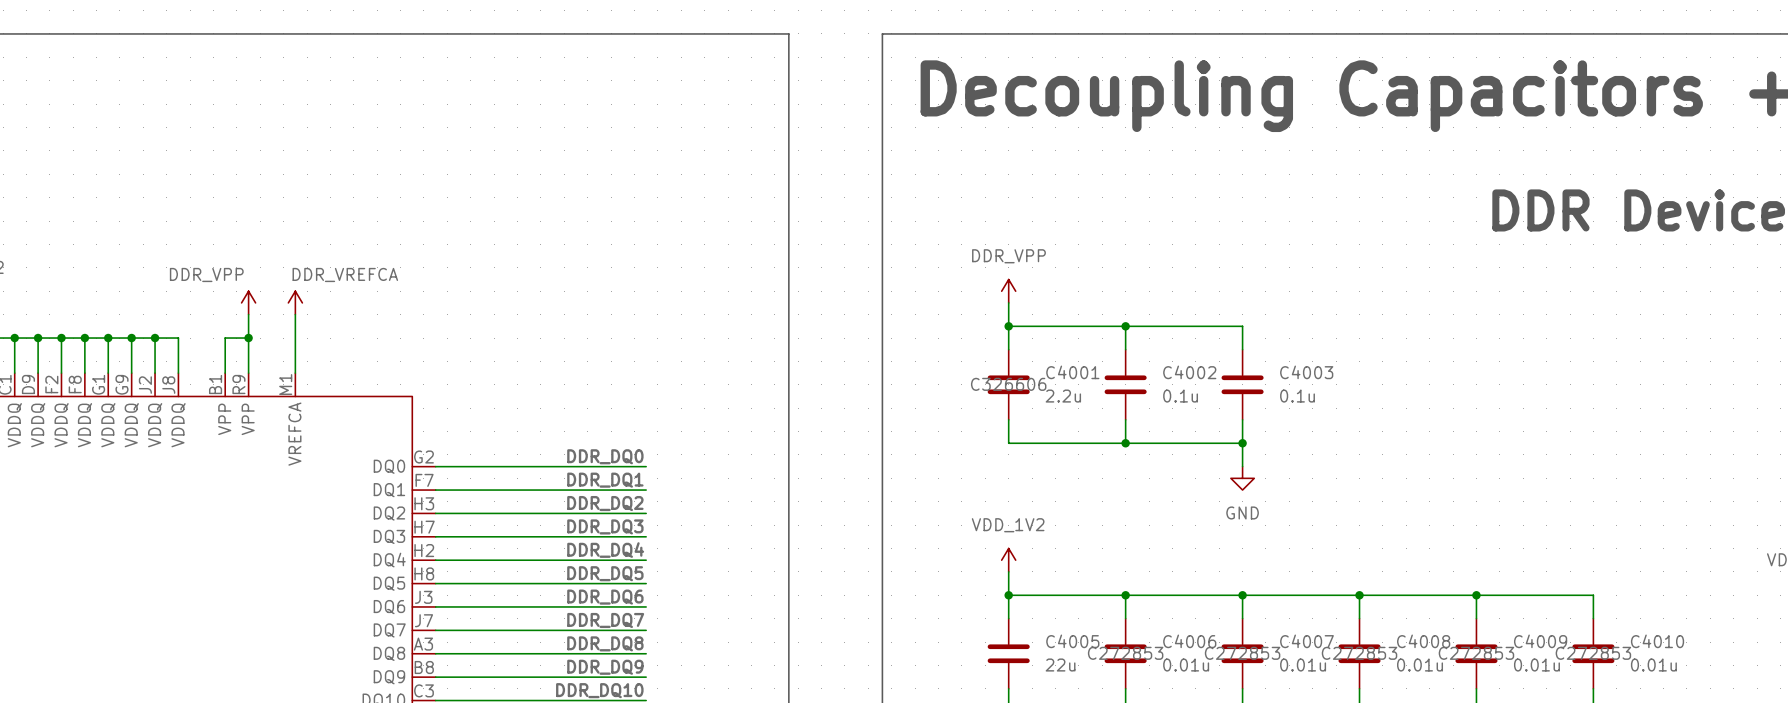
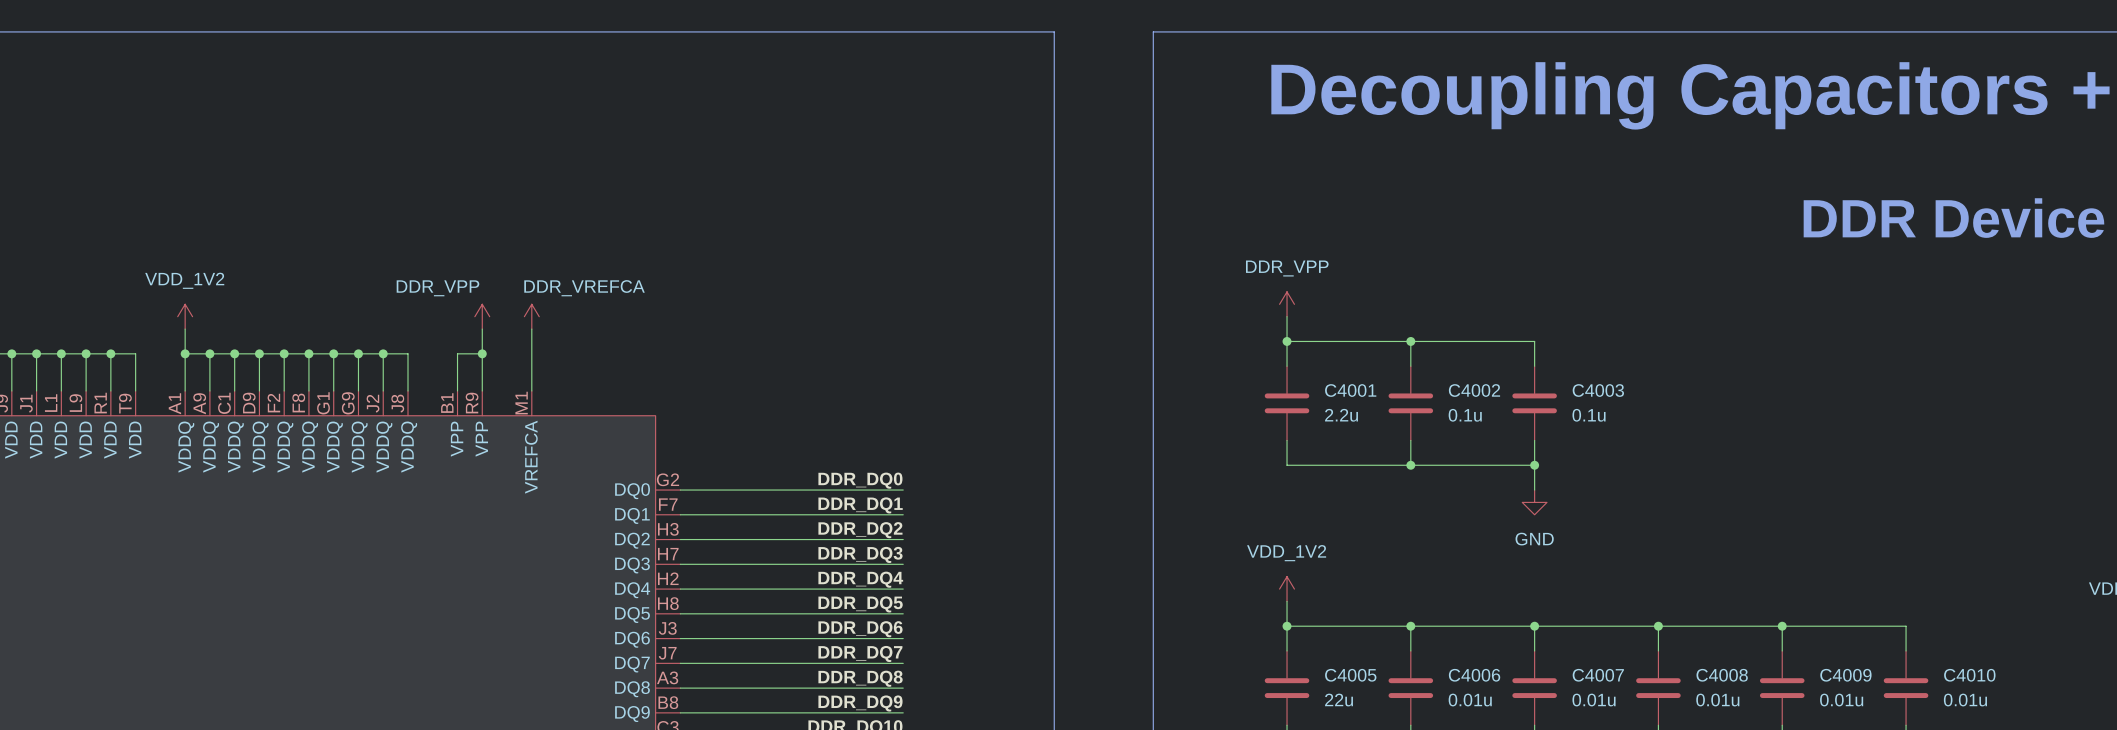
C4001 text: C326606 (1008, 384) -> none
C4006 text: C272853 (1125, 653) -> none
C4007 text: C272853 (1242, 653) -> none
C4008 text: C272853 (1359, 653) -> none
C4009 text: C272853 (1476, 653) -> none
C4010 text: C272853 (1593, 653) -> none

